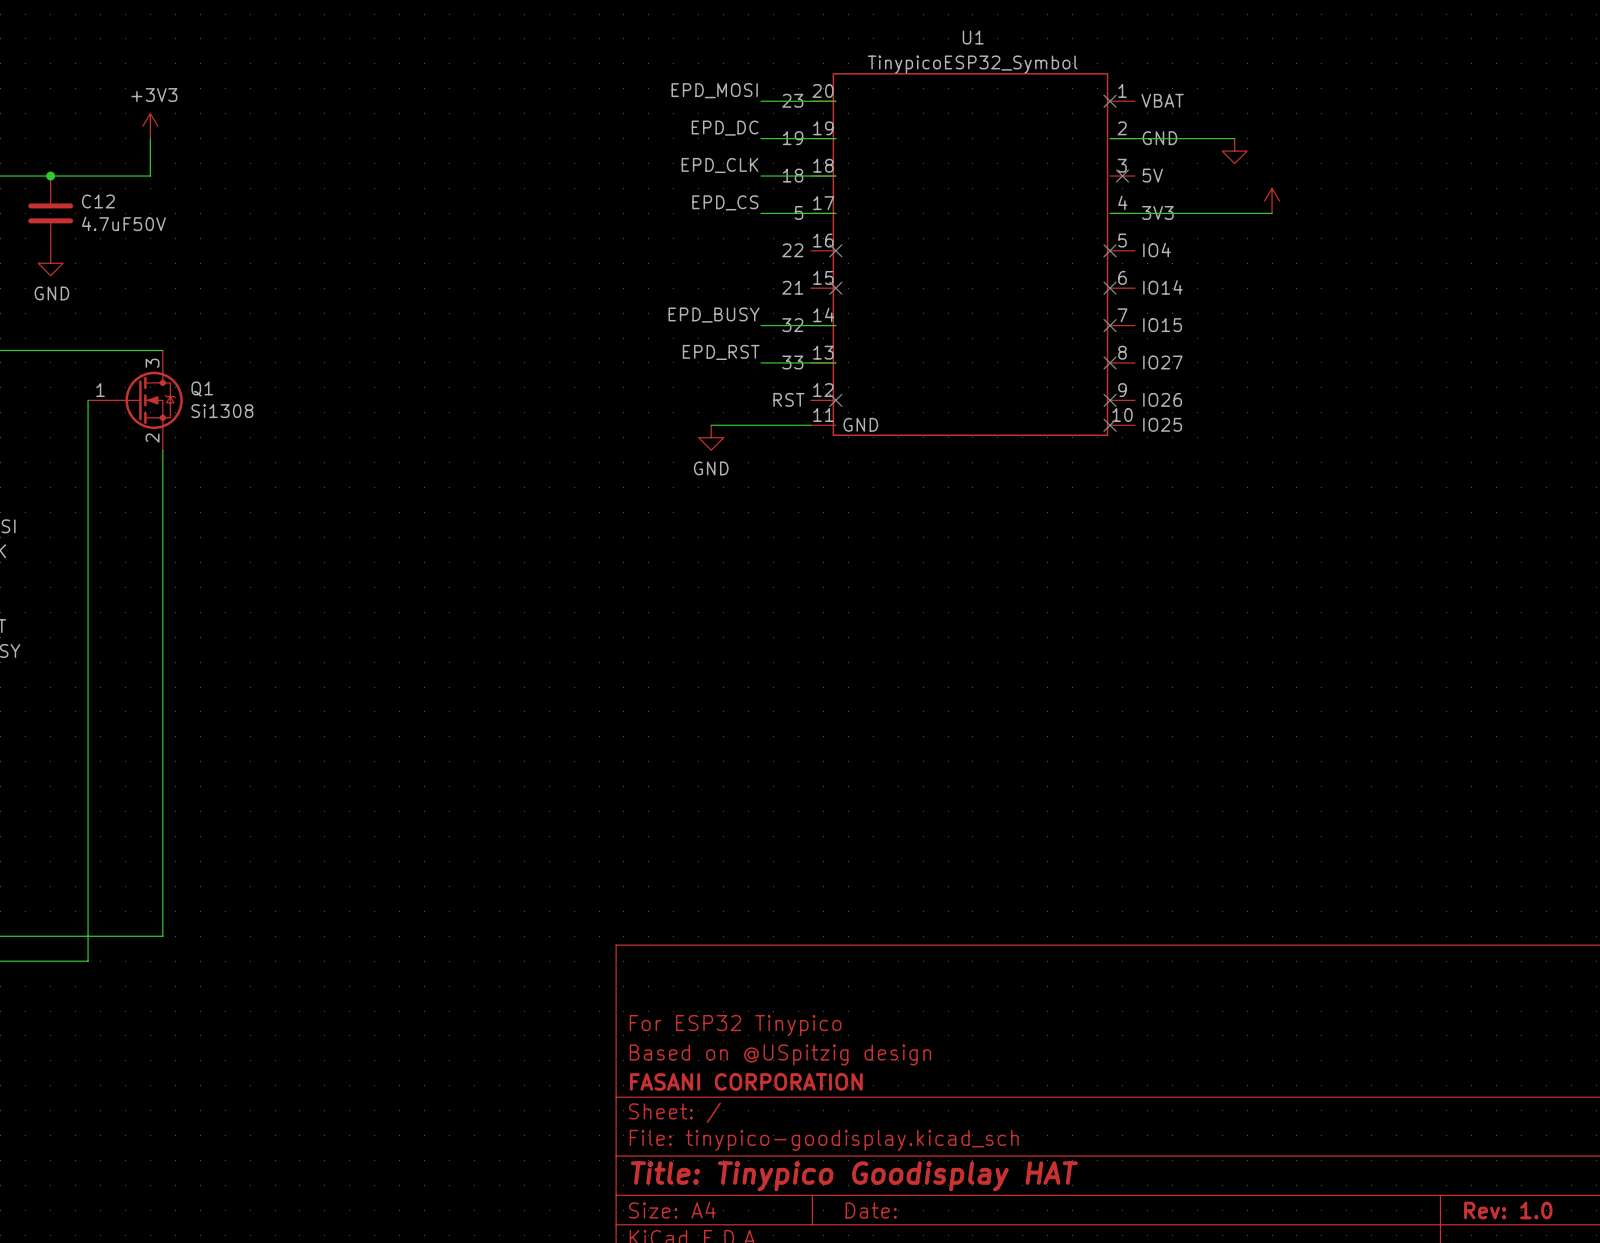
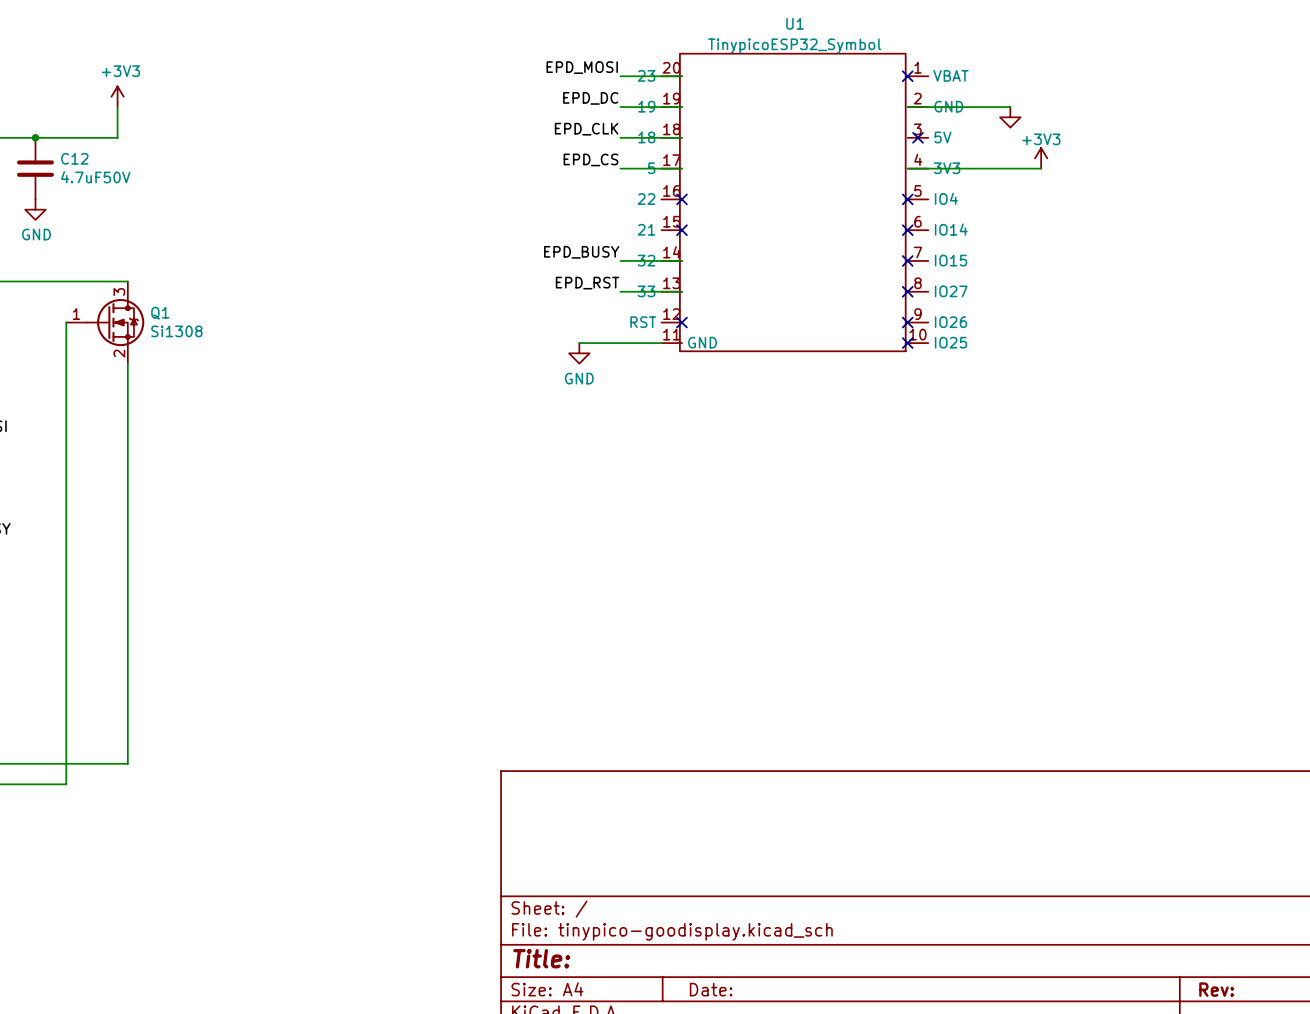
power symbol text: none -> +3V3 (1041, 139)
title block: For ESP32 Tinypico (735, 1025) -> none
title block: Based on @USpitzig design (780, 1054) -> none
title block: FASANI CORPORATION (746, 1081) -> none
title block: Title: Tinypico Goodisplay HAT (854, 1176) -> Title: (541, 958)
title block: Rev: 1.0 (1508, 1210) -> Rev: (1216, 989)

